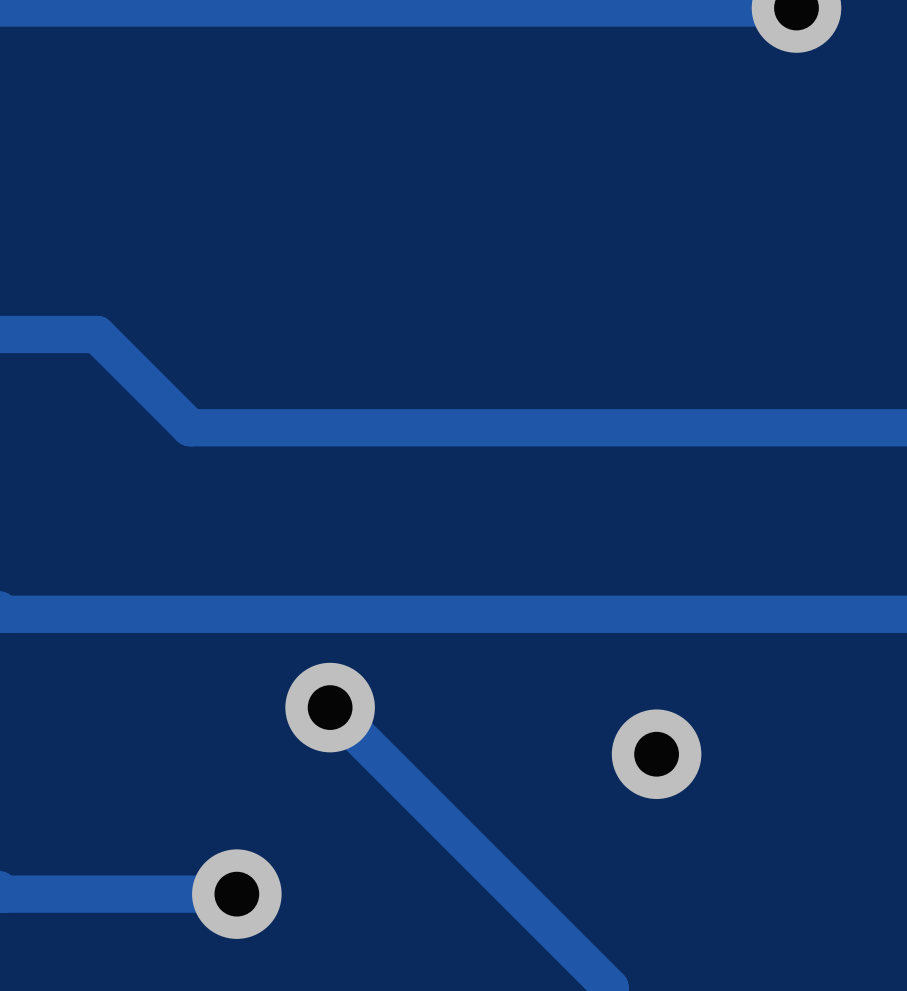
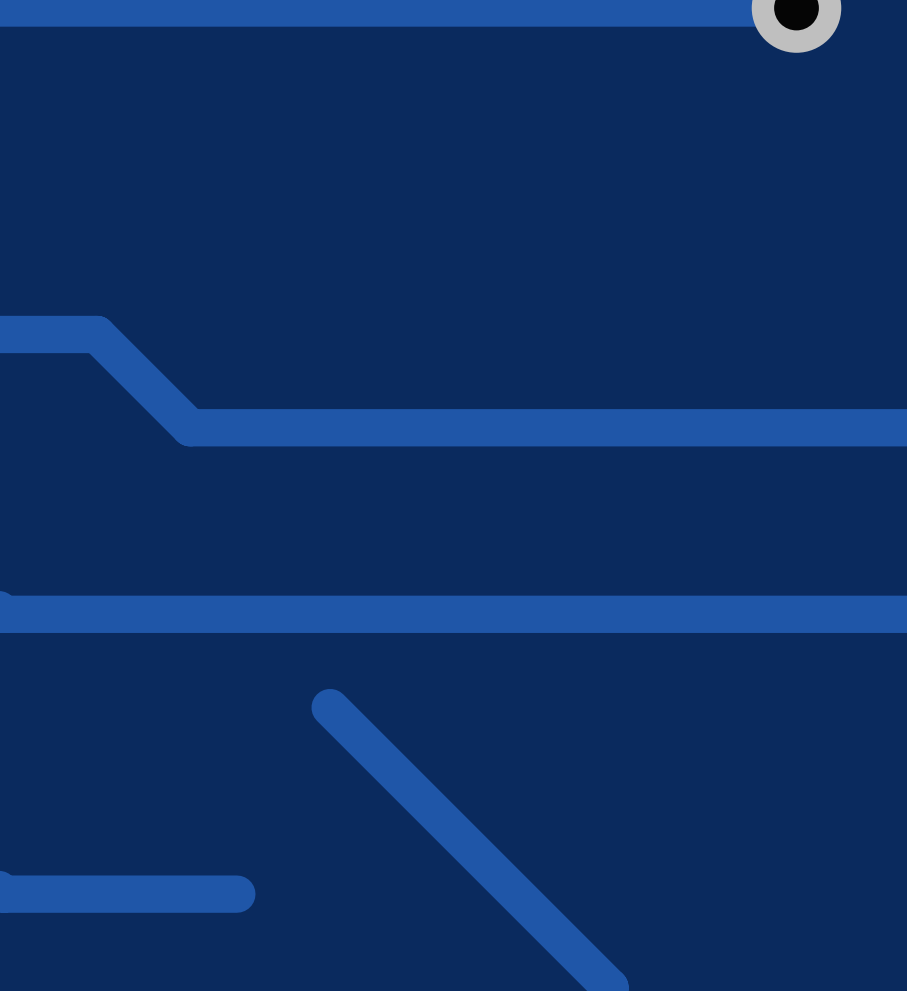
via: (330, 707) -> none
via: (656, 754) -> none
via: (236, 894) -> none

